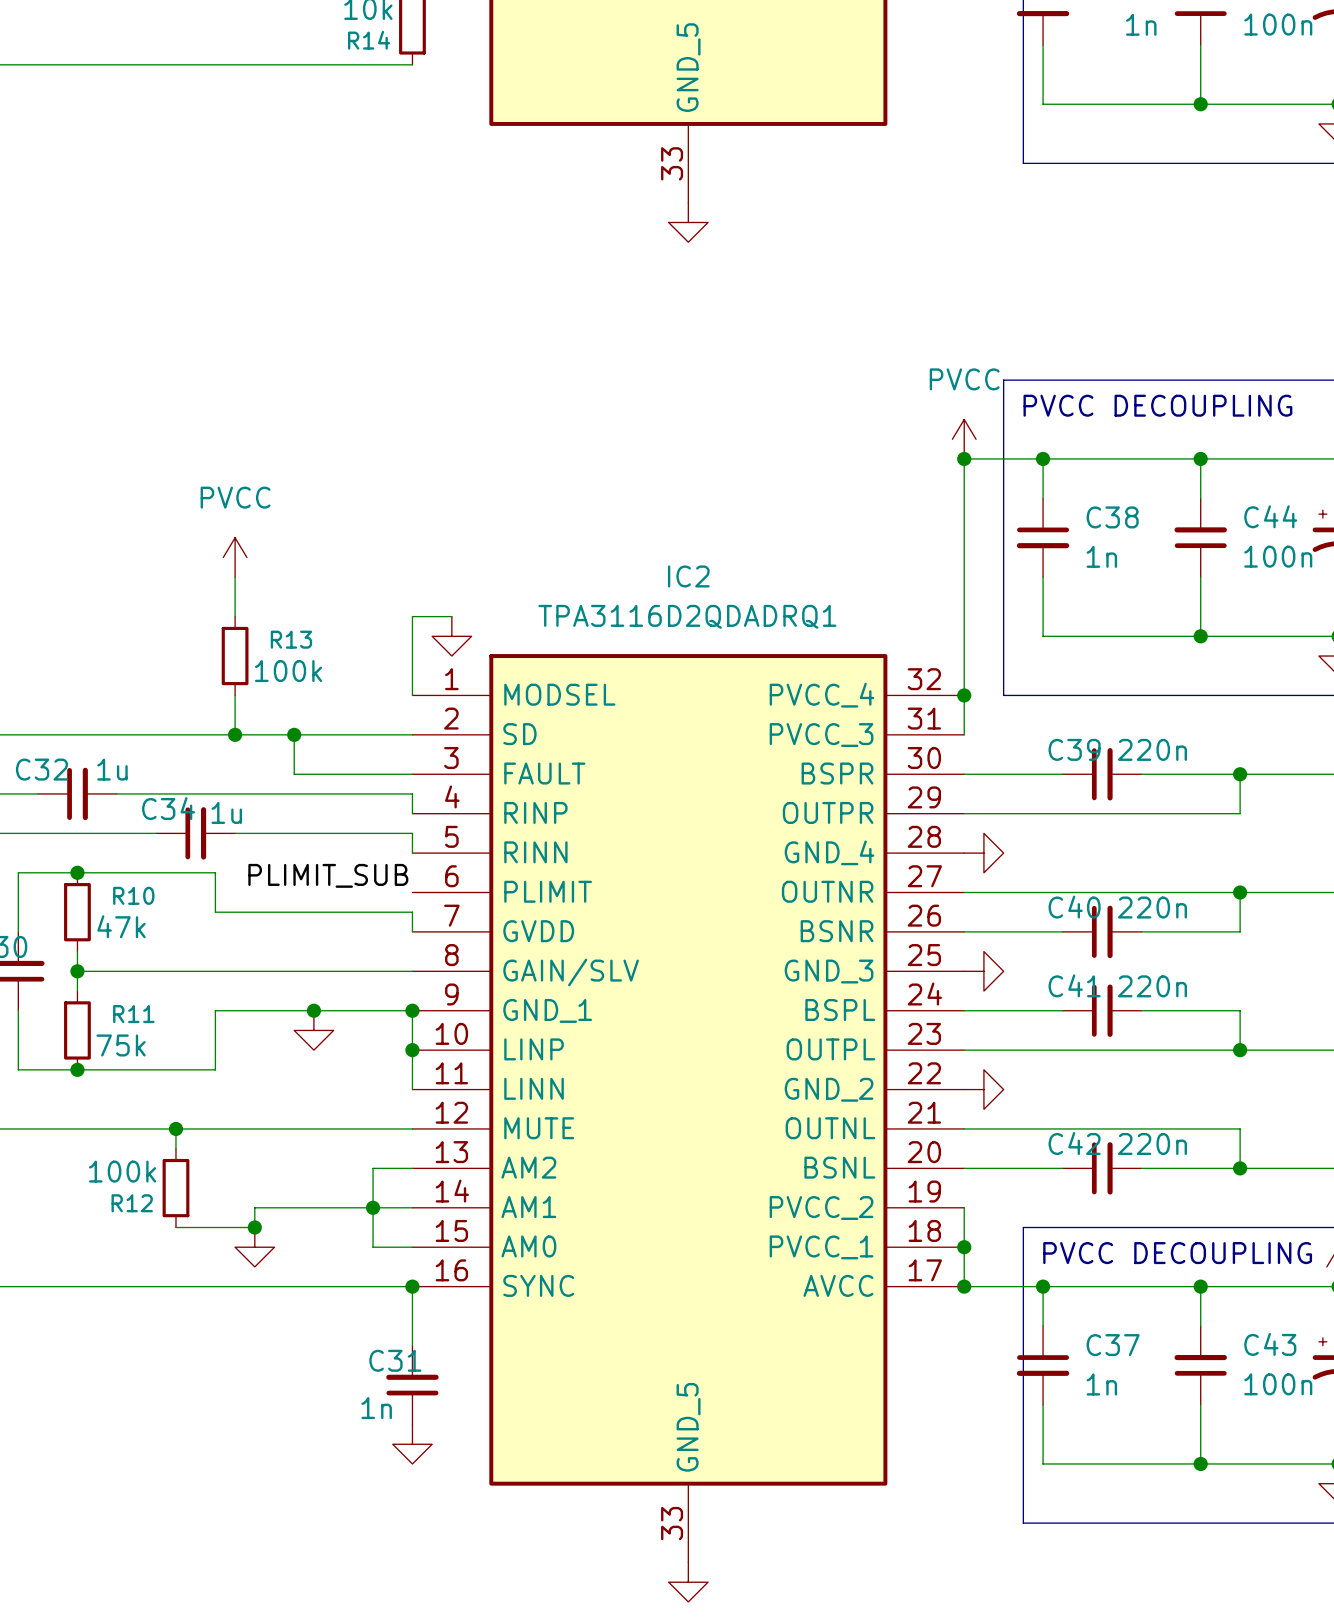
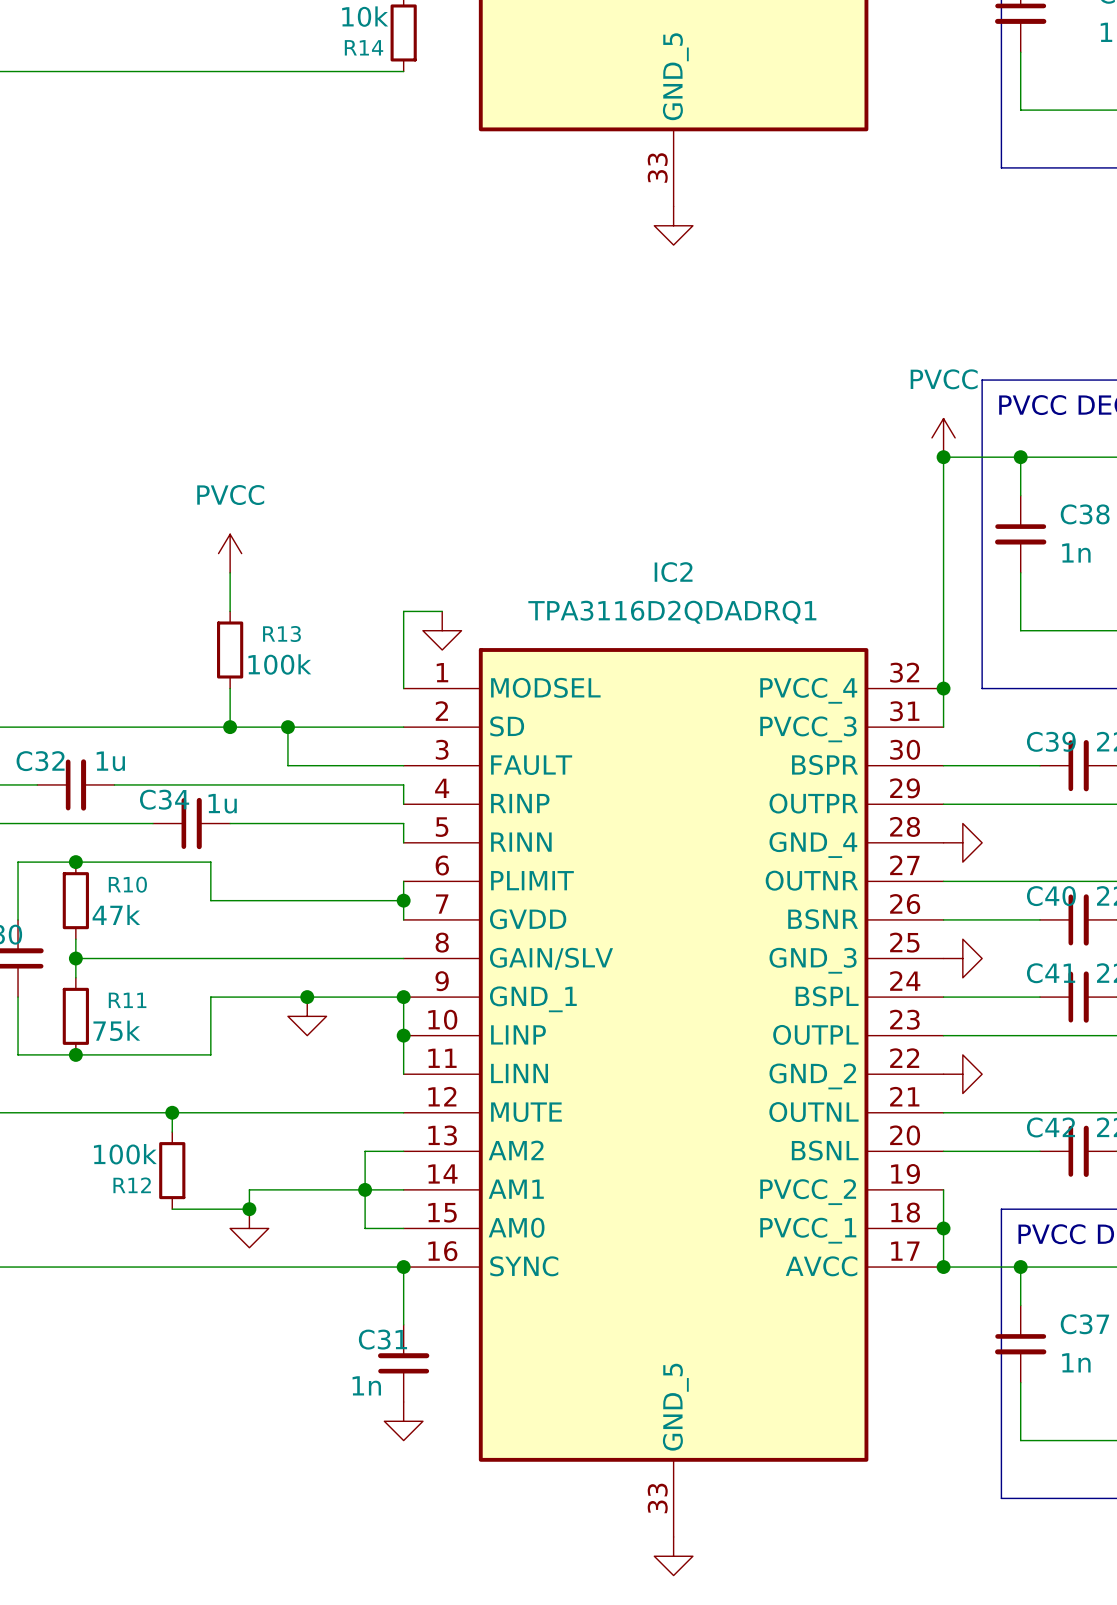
label: PLIMIT_SUB (328, 875) -> none
wire: none -> (403, 881) (403, 900)
junction: none -> (403, 900)

